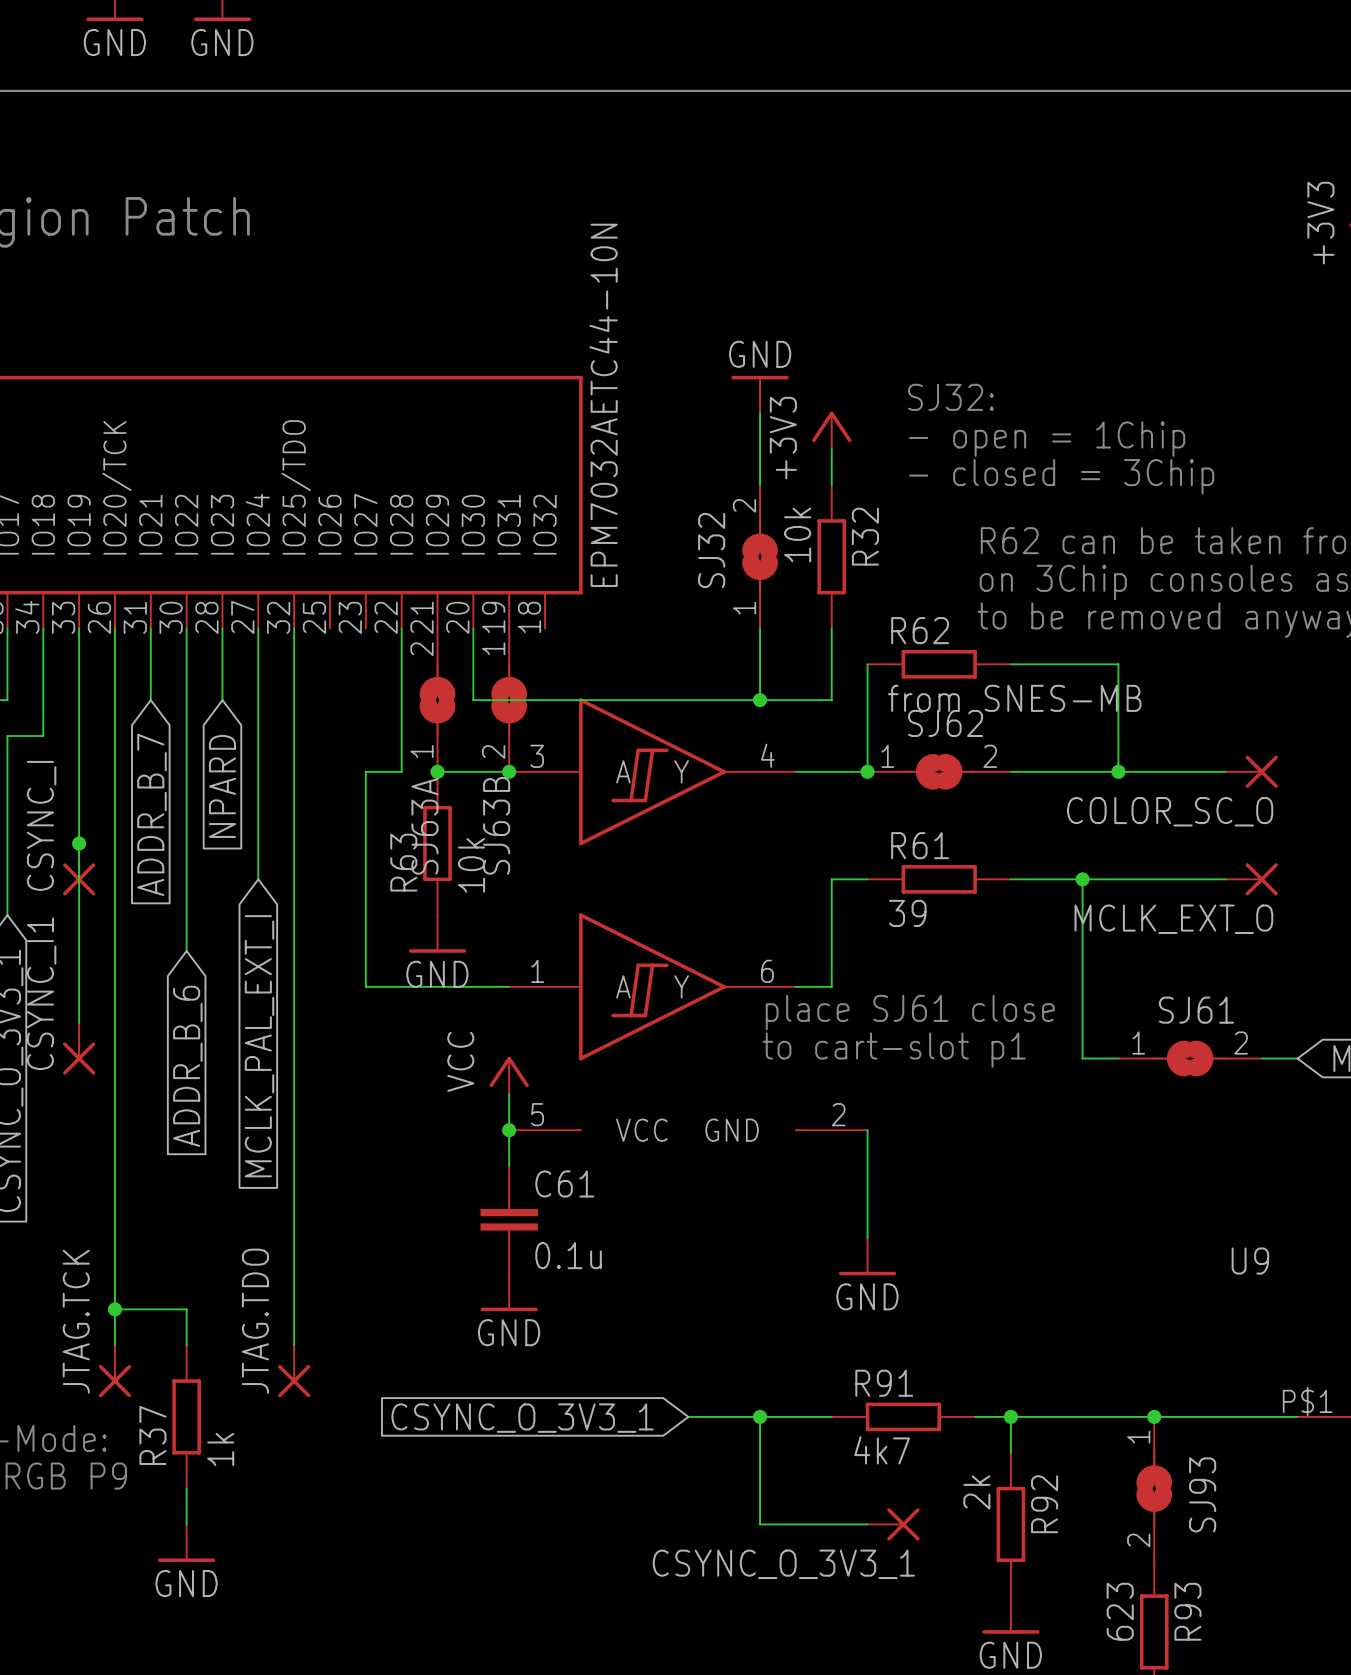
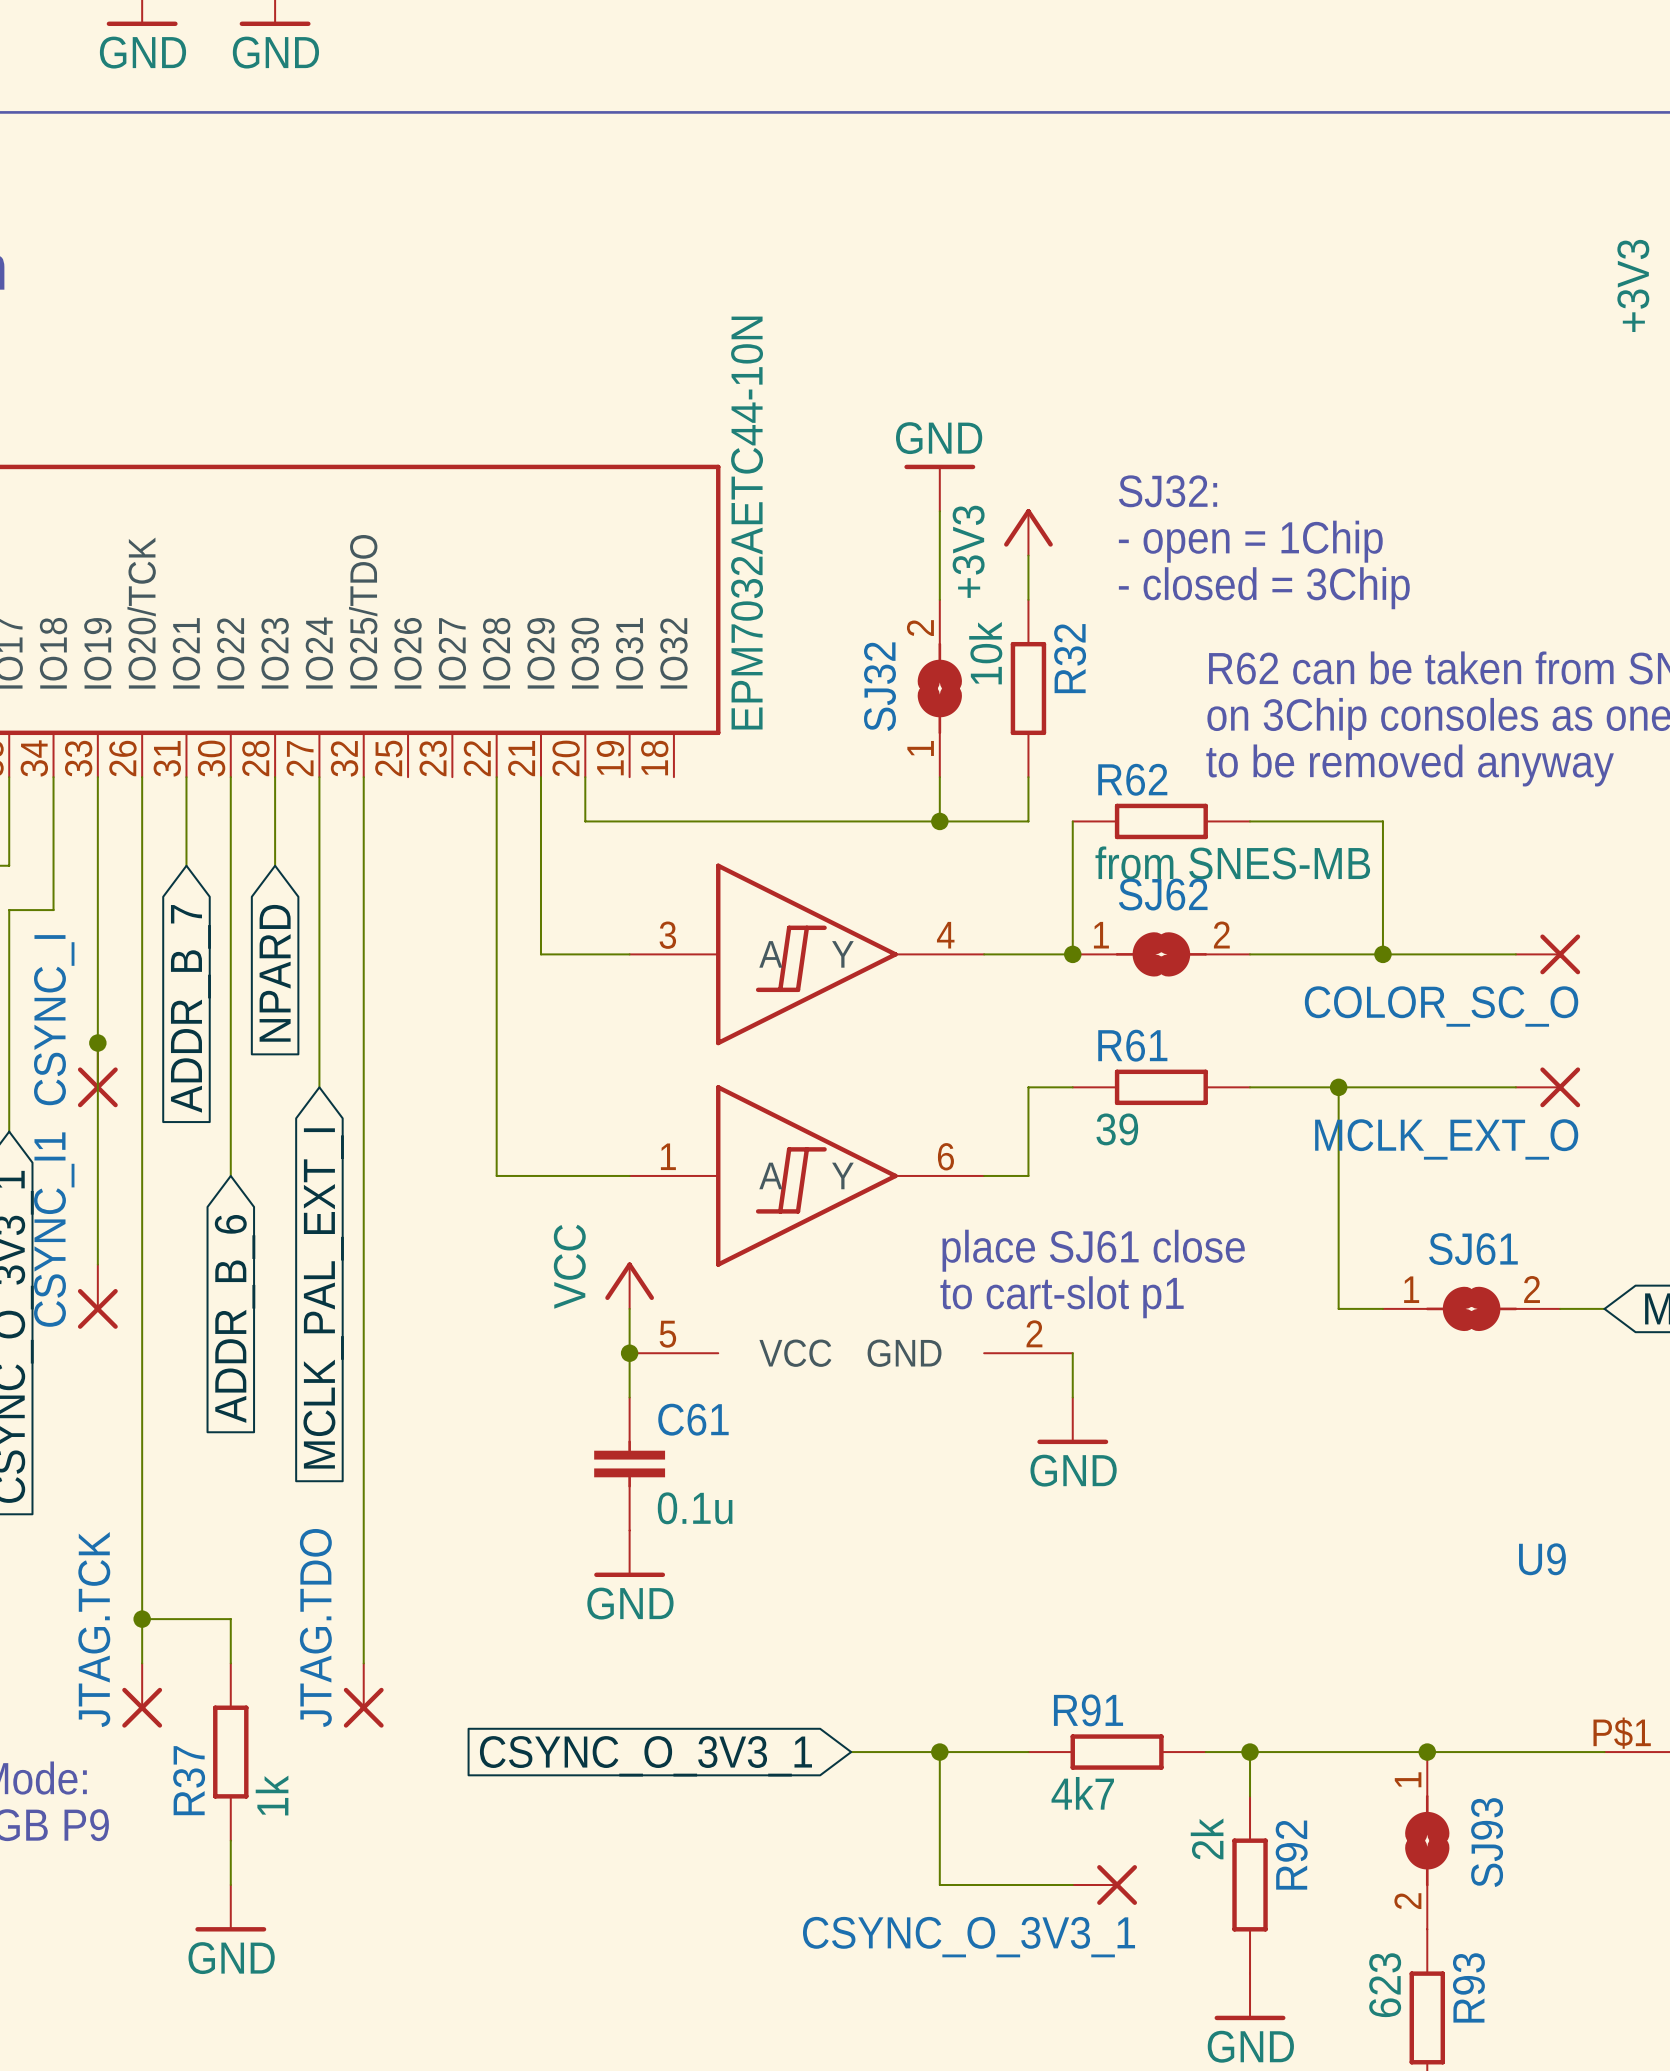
wire: (473, 664) (473, 700) (831, 700) (831, 664) -> (585, 821) (1028, 821)
wire: (760, 664) (760, 700) -> none
SJ63A: (437, 700) -> none
SJ63B: (509, 700) -> none
junction position: (760, 700) -> (939, 821)
wire: (401, 771) (365, 771) (365, 986) (509, 986) -> (496, 954) (496, 1175) (629, 1175)
junction: (437, 771) -> none
junction: (509, 771) -> none
R63: 10k (437, 843) -> none
power symbol: GND (437, 933) -> none
wire: (831, 951) (831, 986) (795, 986) -> (1028, 1175) (984, 1175)
part position: (652, 986) -> (806, 1175)
power symbol position: VCC (509, 1075) -> VCC (629, 1285)
junction position: (509, 1130) -> (629, 1353)
part position: (688, 1130) -> (851, 1353)
wire: (867, 1130) (867, 1237) -> (1072, 1397) (1072, 1353)
C61 position: (509, 1219) -> (629, 1464)
power symbol position: GND (867, 1256) -> GND (1072, 1420)
power symbol position: GND (509, 1292) -> GND (629, 1553)

